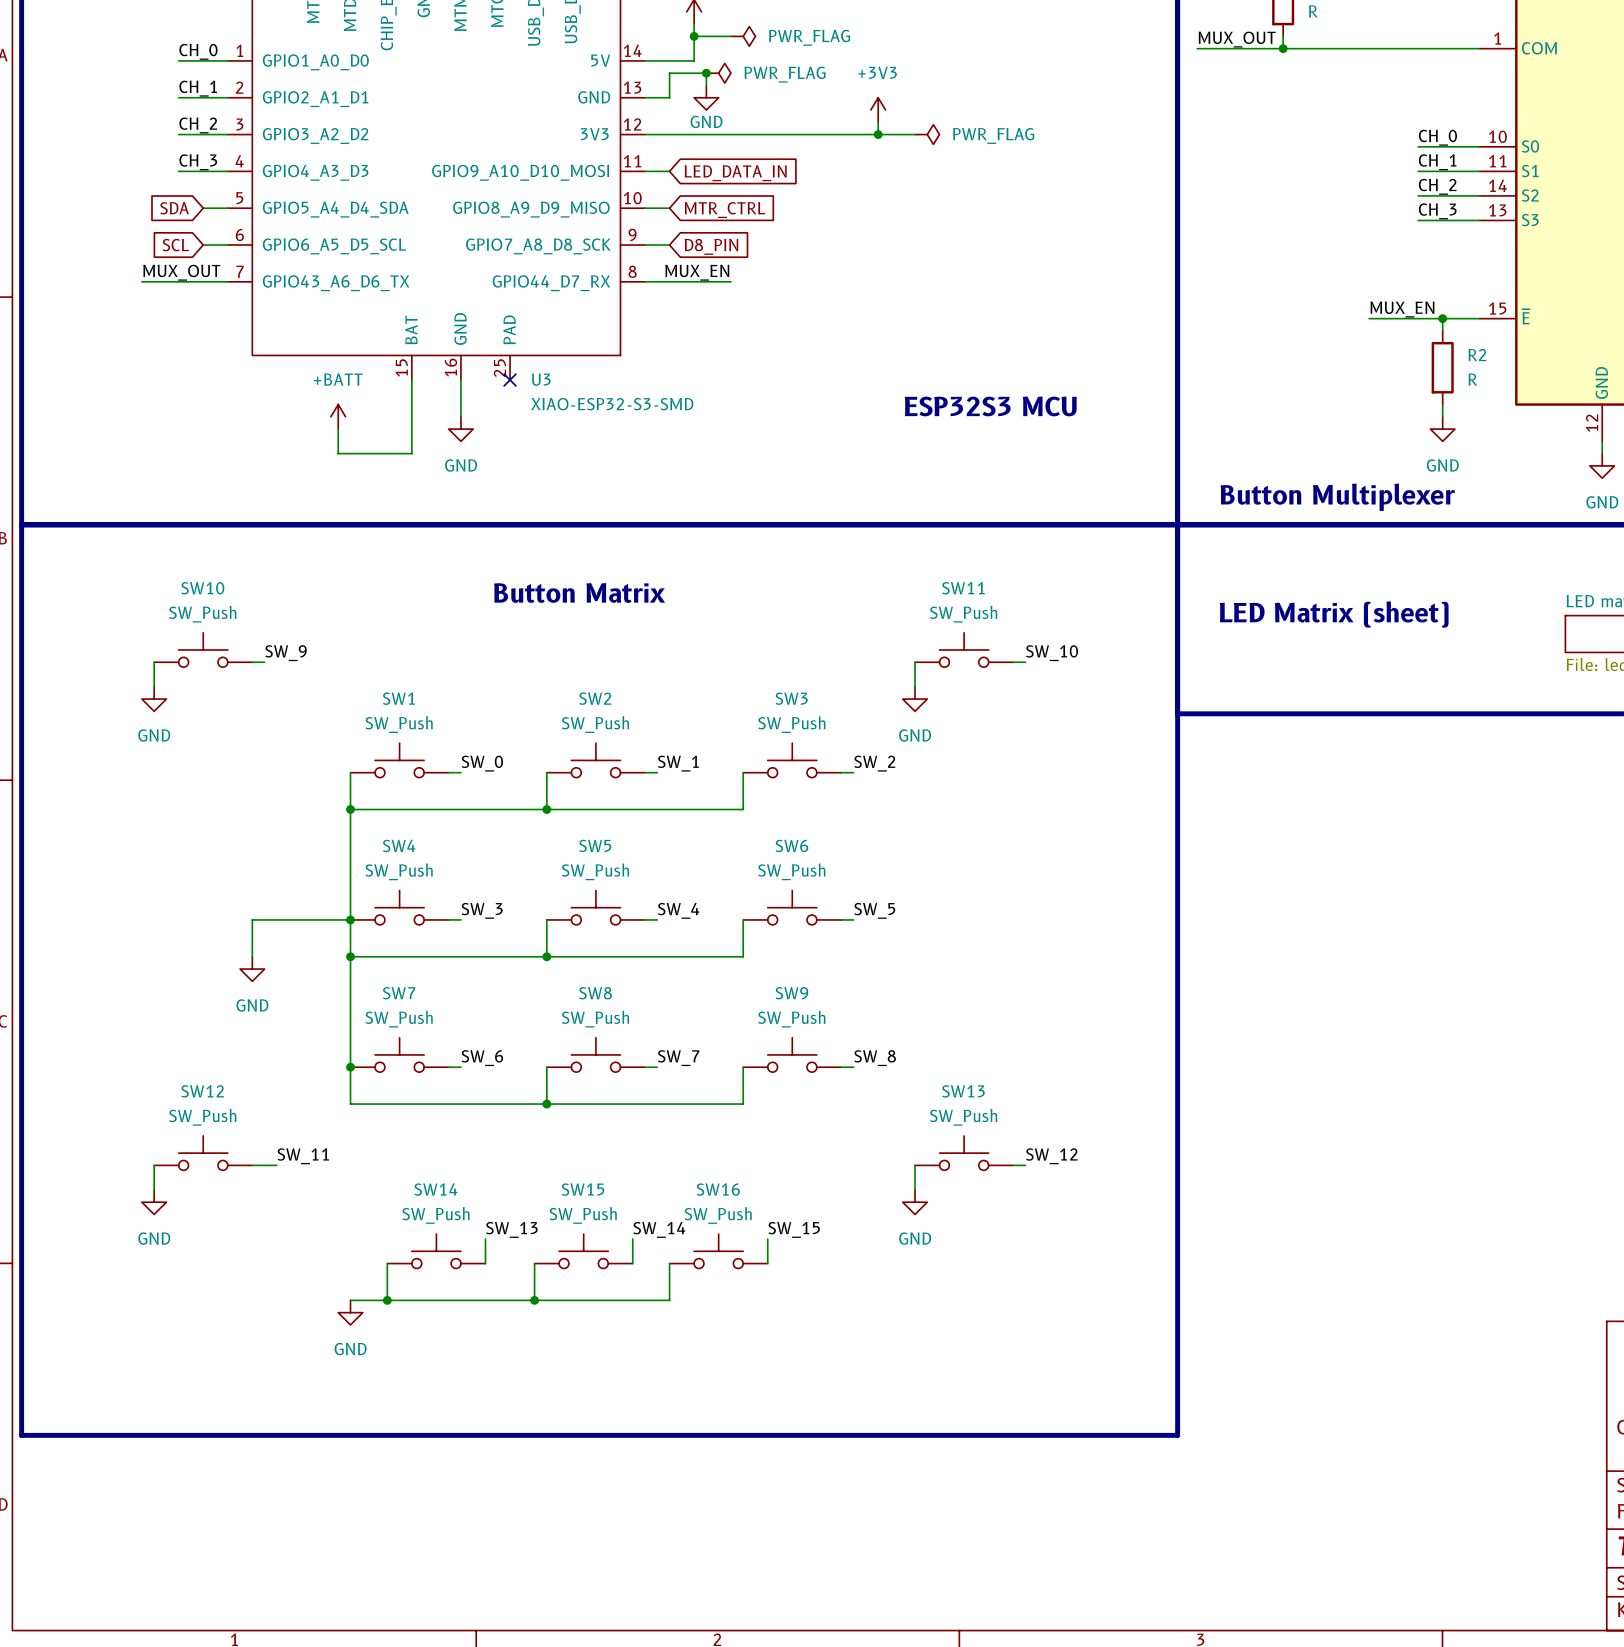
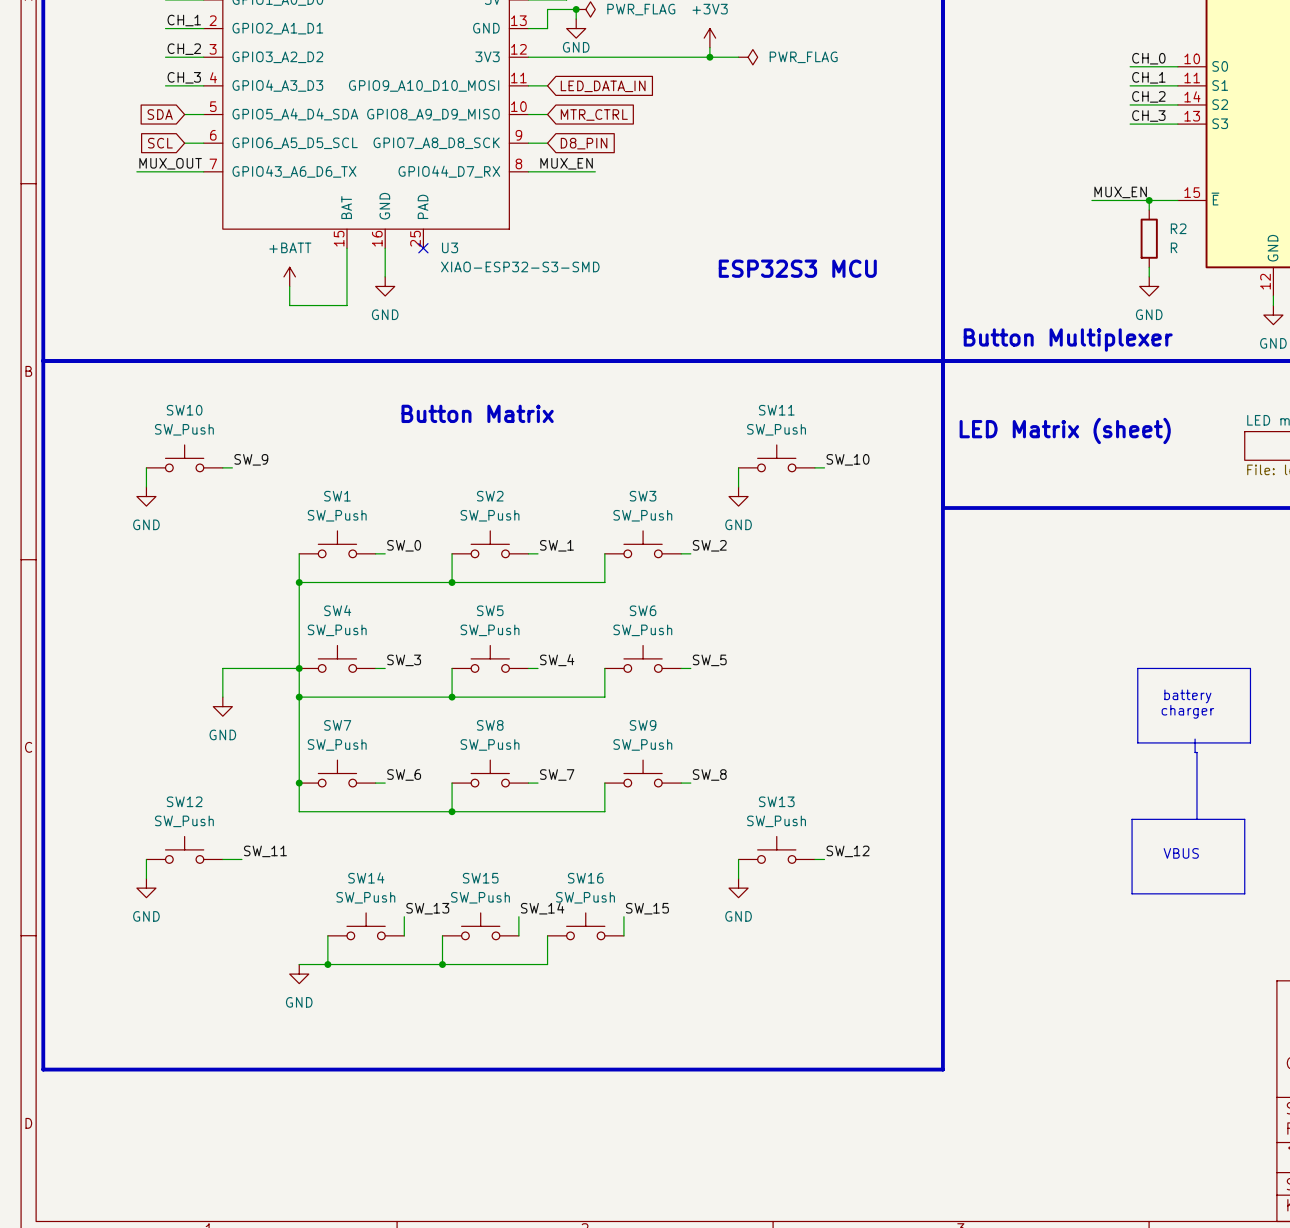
line: none -> (1137, 668) (1250, 668) (1250, 742) (1137, 742) (1137, 668)
text: none -> battery (1187, 696)
text: none -> charger (1187, 711)
line: none -> (1195, 739) (1195, 752) (1196, 752) (1196, 819)
line: none -> (1132, 819) (1244, 819) (1244, 893) (1132, 893) (1132, 819)
text: none -> VBUS (1181, 853)

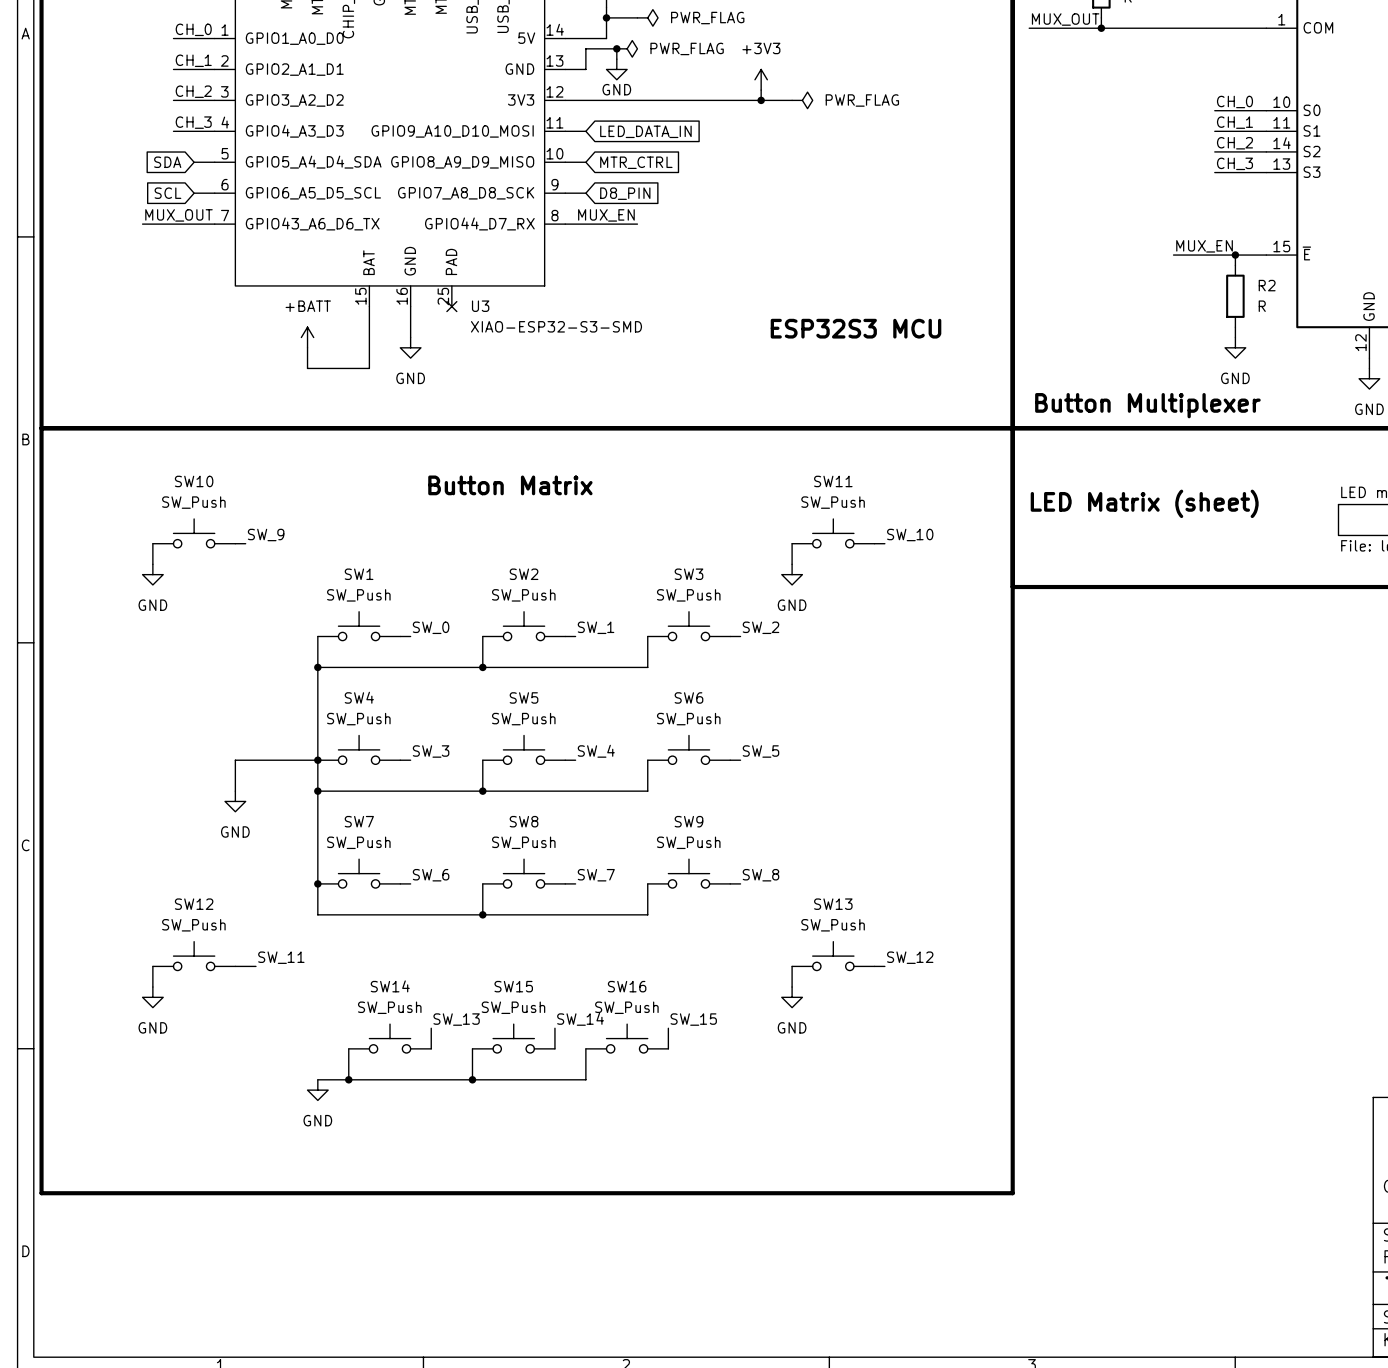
line: (1137, 668) (1250, 668) (1250, 742) (1137, 742) (1137, 668) -> none
text: battery (1187, 696) -> none
text: charger (1187, 711) -> none
line: (1195, 739) (1195, 752) (1196, 752) (1196, 819) -> none
line: (1132, 819) (1244, 819) (1244, 893) (1132, 893) (1132, 819) -> none
text: VBUS (1181, 853) -> none

